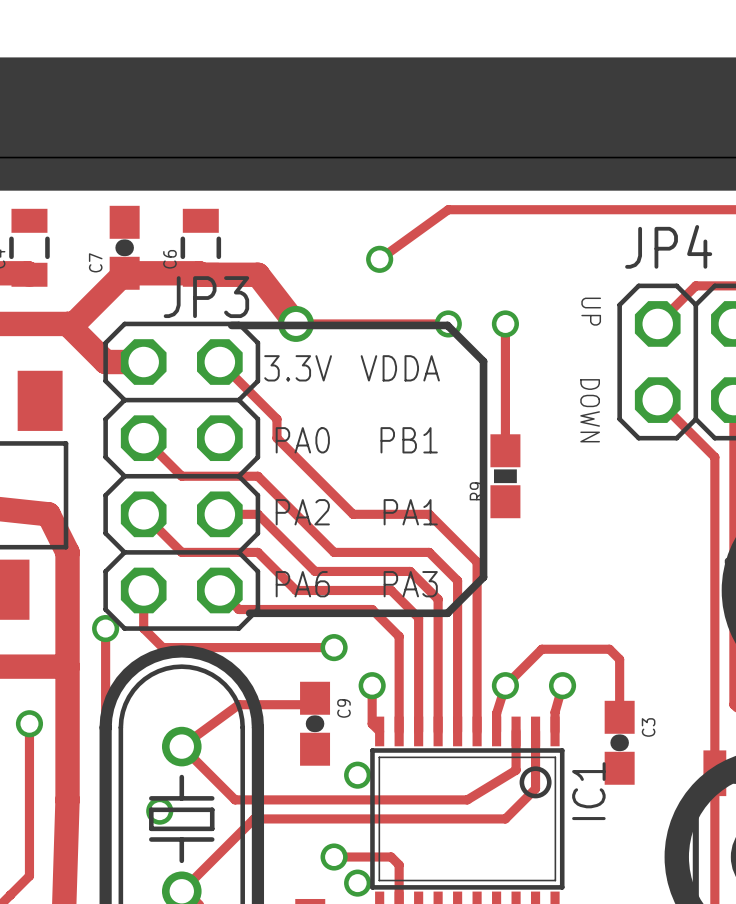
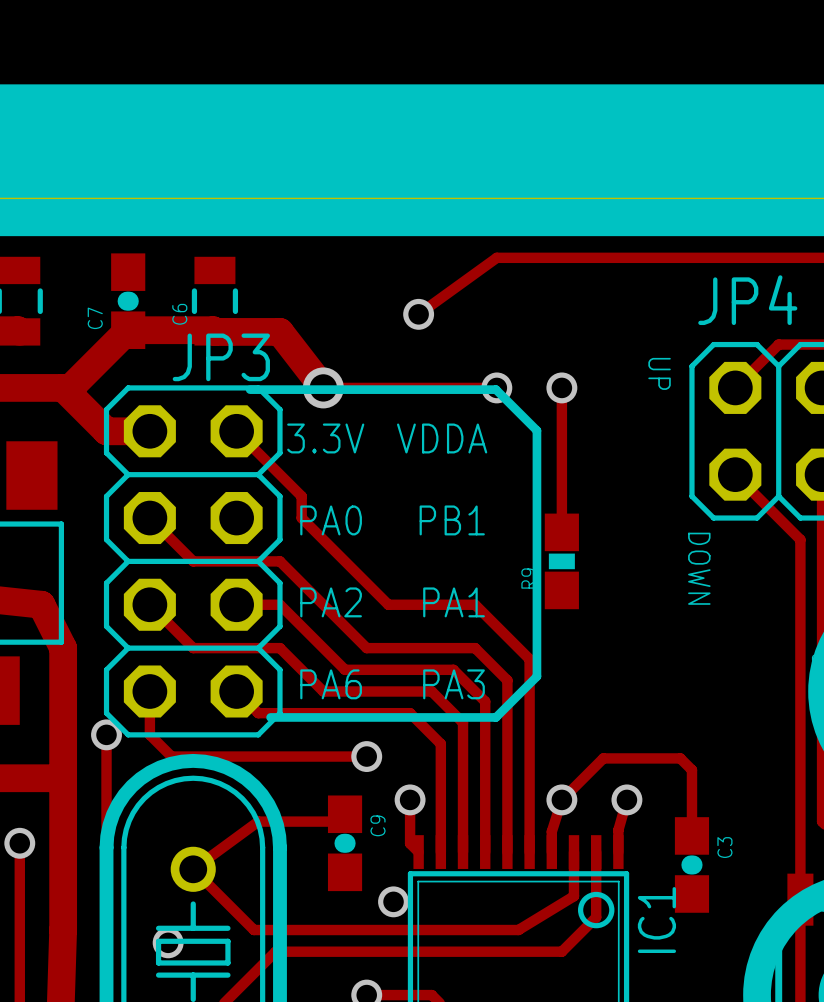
text position: DOWN (590, 410) -> DOWN (699, 568)

